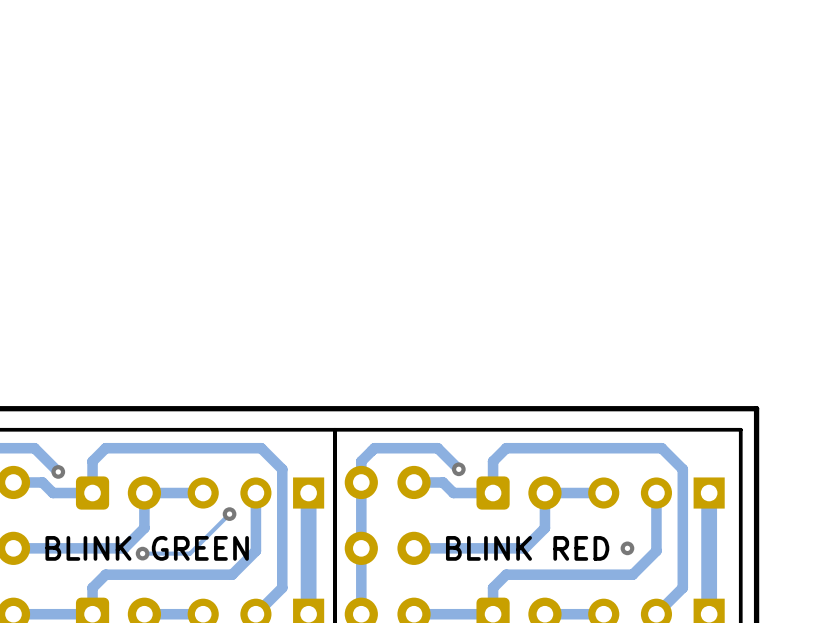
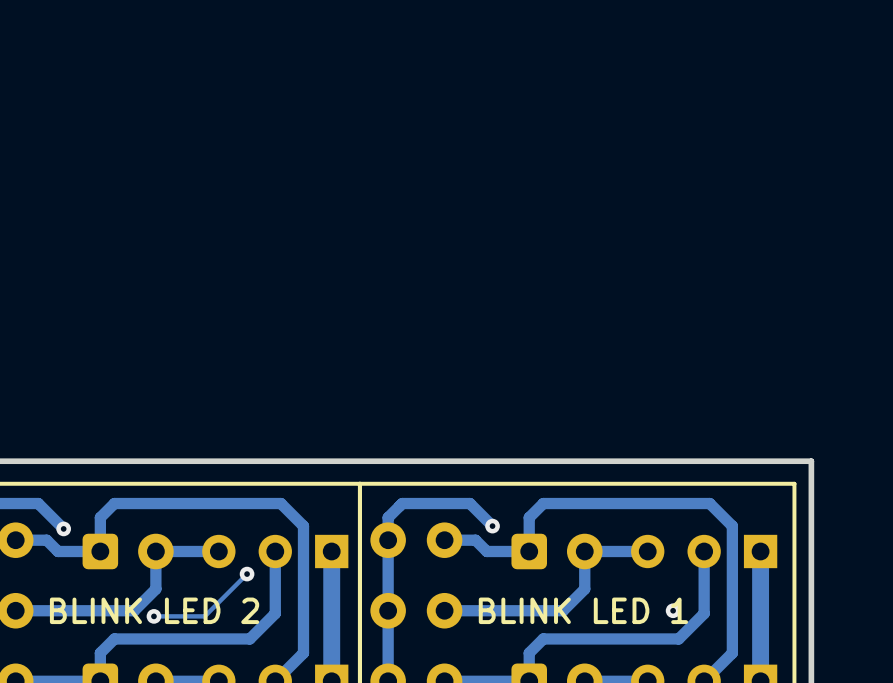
text: BLINK GREEN (147, 548) -> BLINK LED 2 (154, 610)
text: BLINK RED (527, 548) -> BLINK LED 1 (583, 610)

